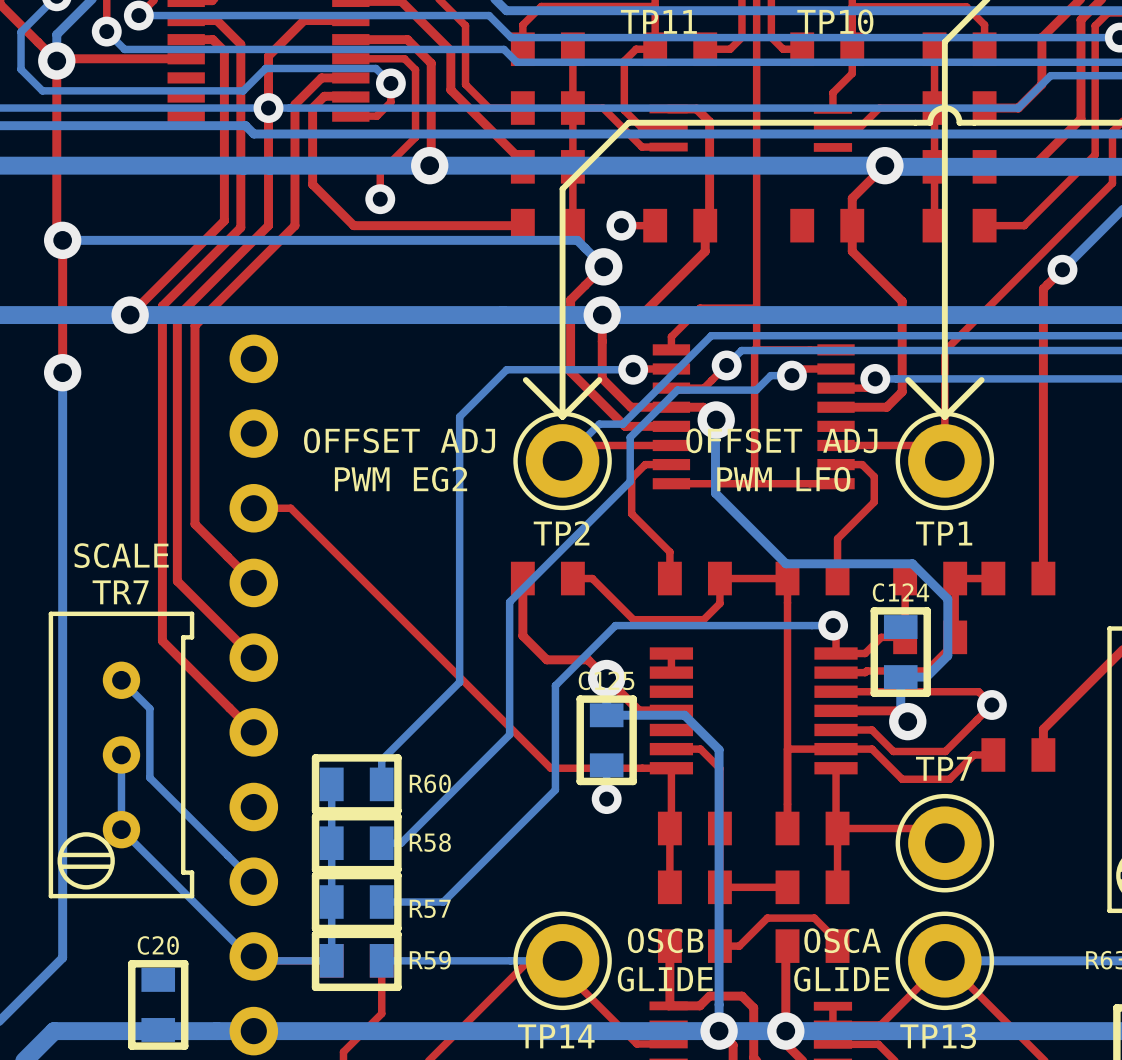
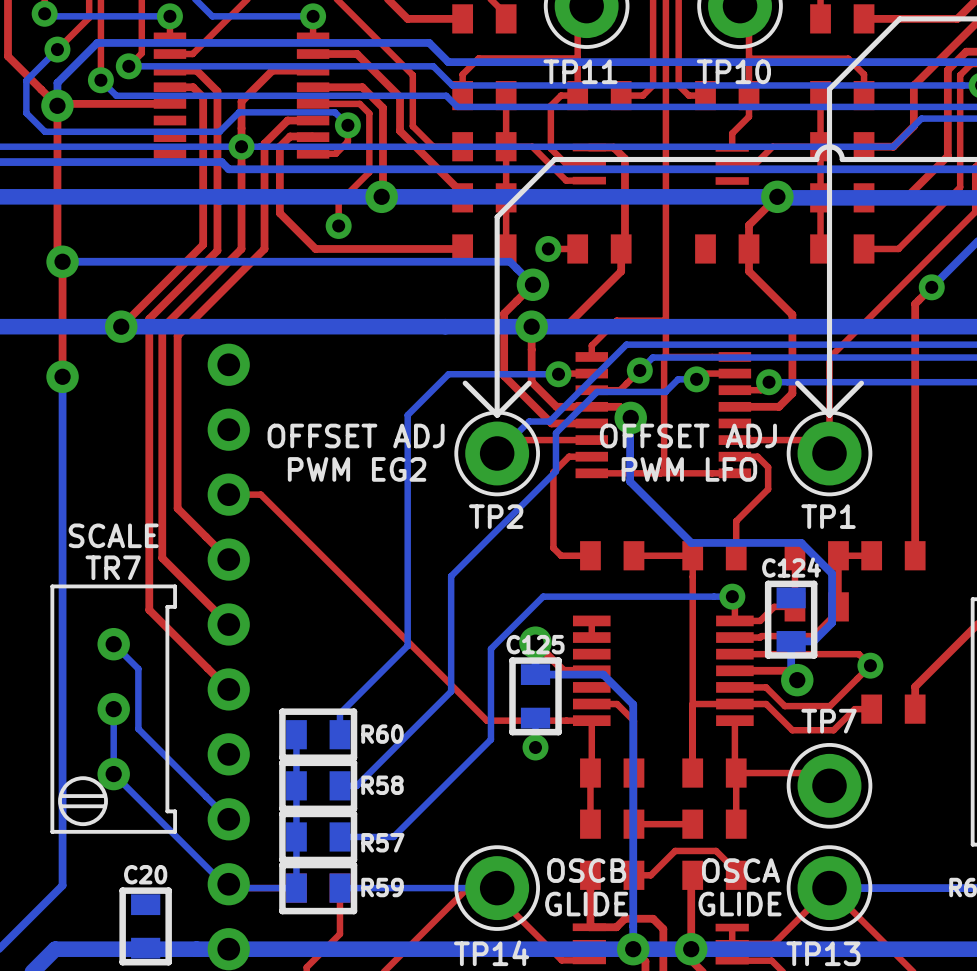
top track: (631, 478) (631, 513) (669, 552) (669, 578) -> (557, 468) (553, 472) (553, 548) (561, 555) (590, 555)
top track: (522, 578) (522, 635) (546, 659) (588, 659) (606, 678) -> none
part: (547, 578) -> none
top track: (719, 578) (719, 603) (703, 619) (633, 619) (592, 578) (572, 578) -> none

